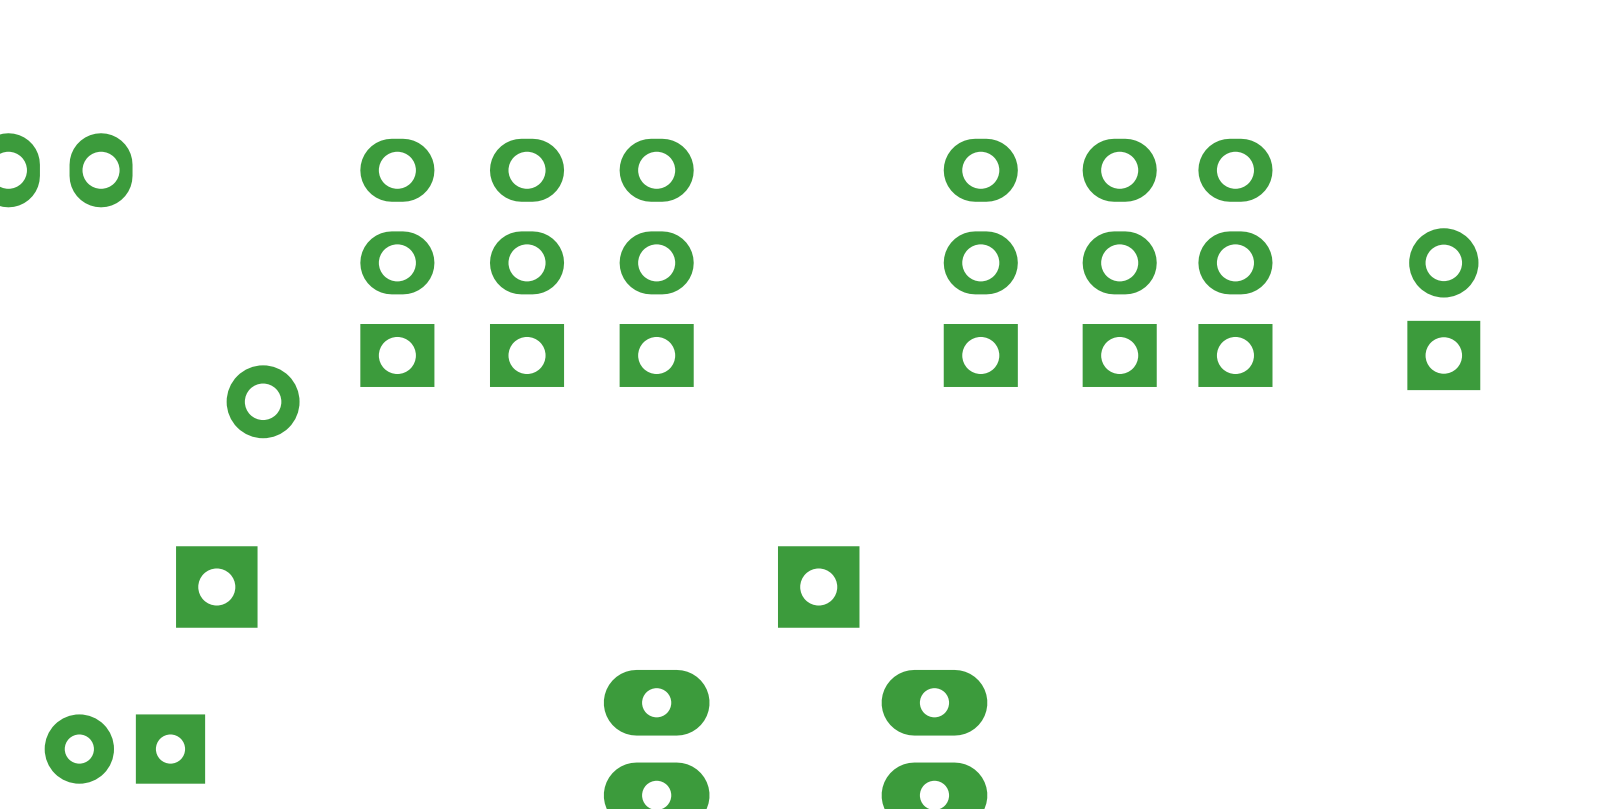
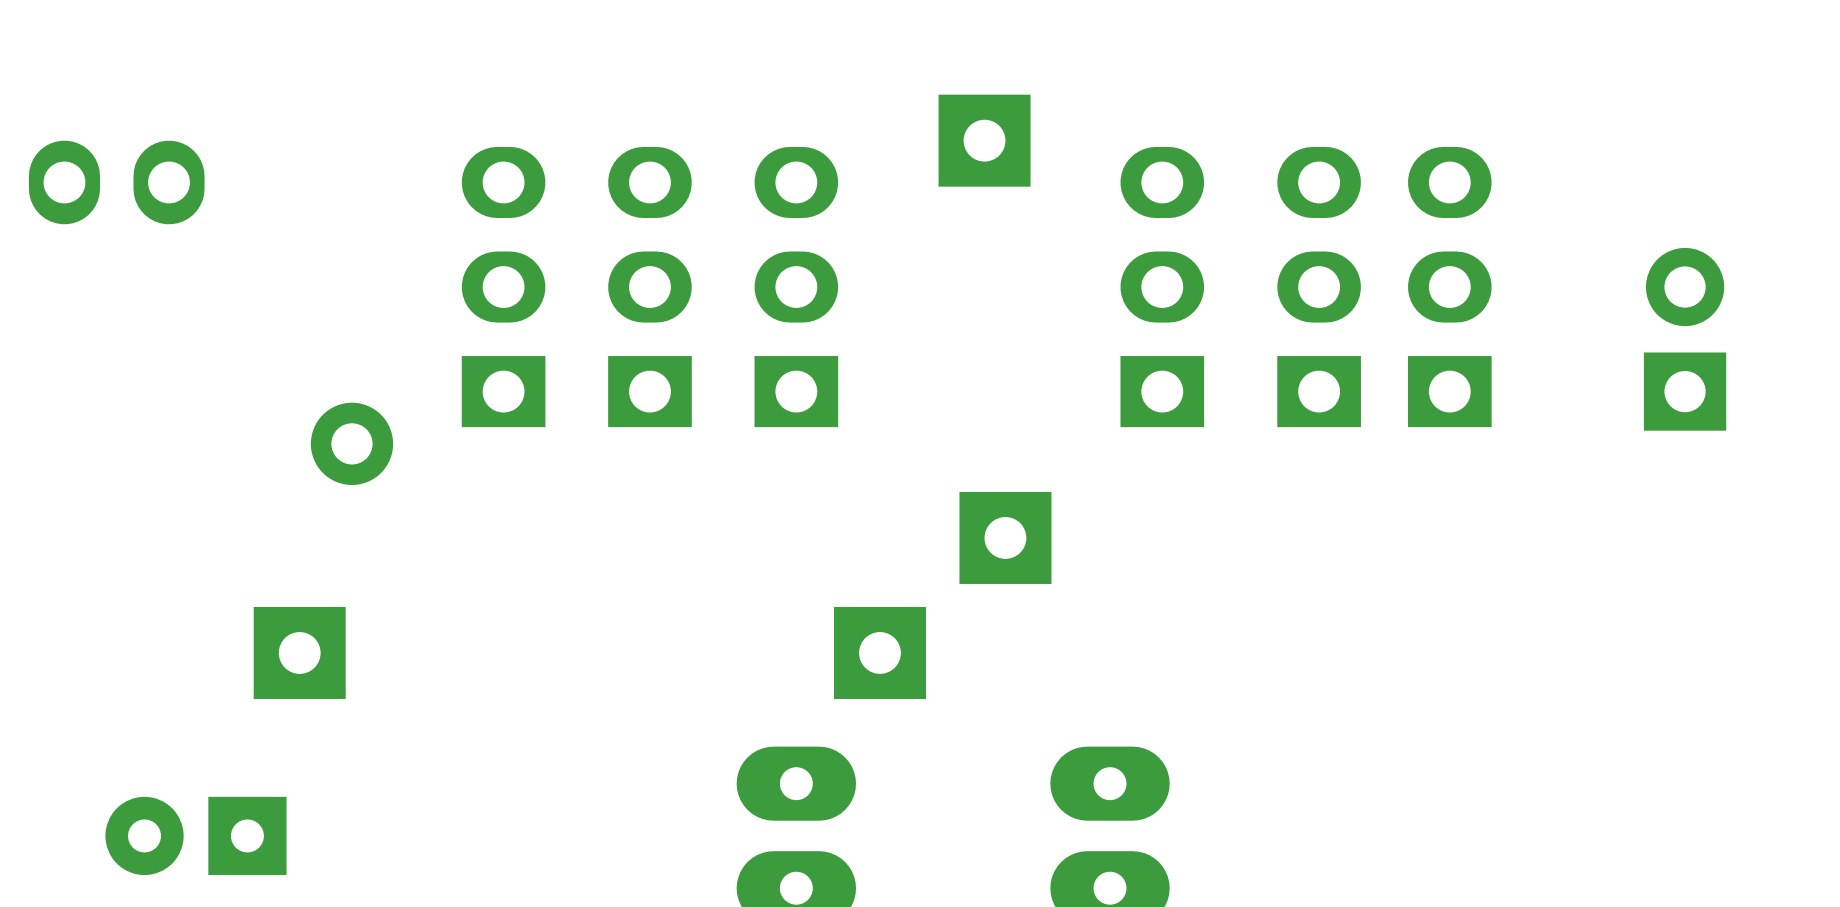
part: none -> (984, 140)
part: none -> (1005, 537)
part: none -> (879, 652)
part: (818, 587) -> none

